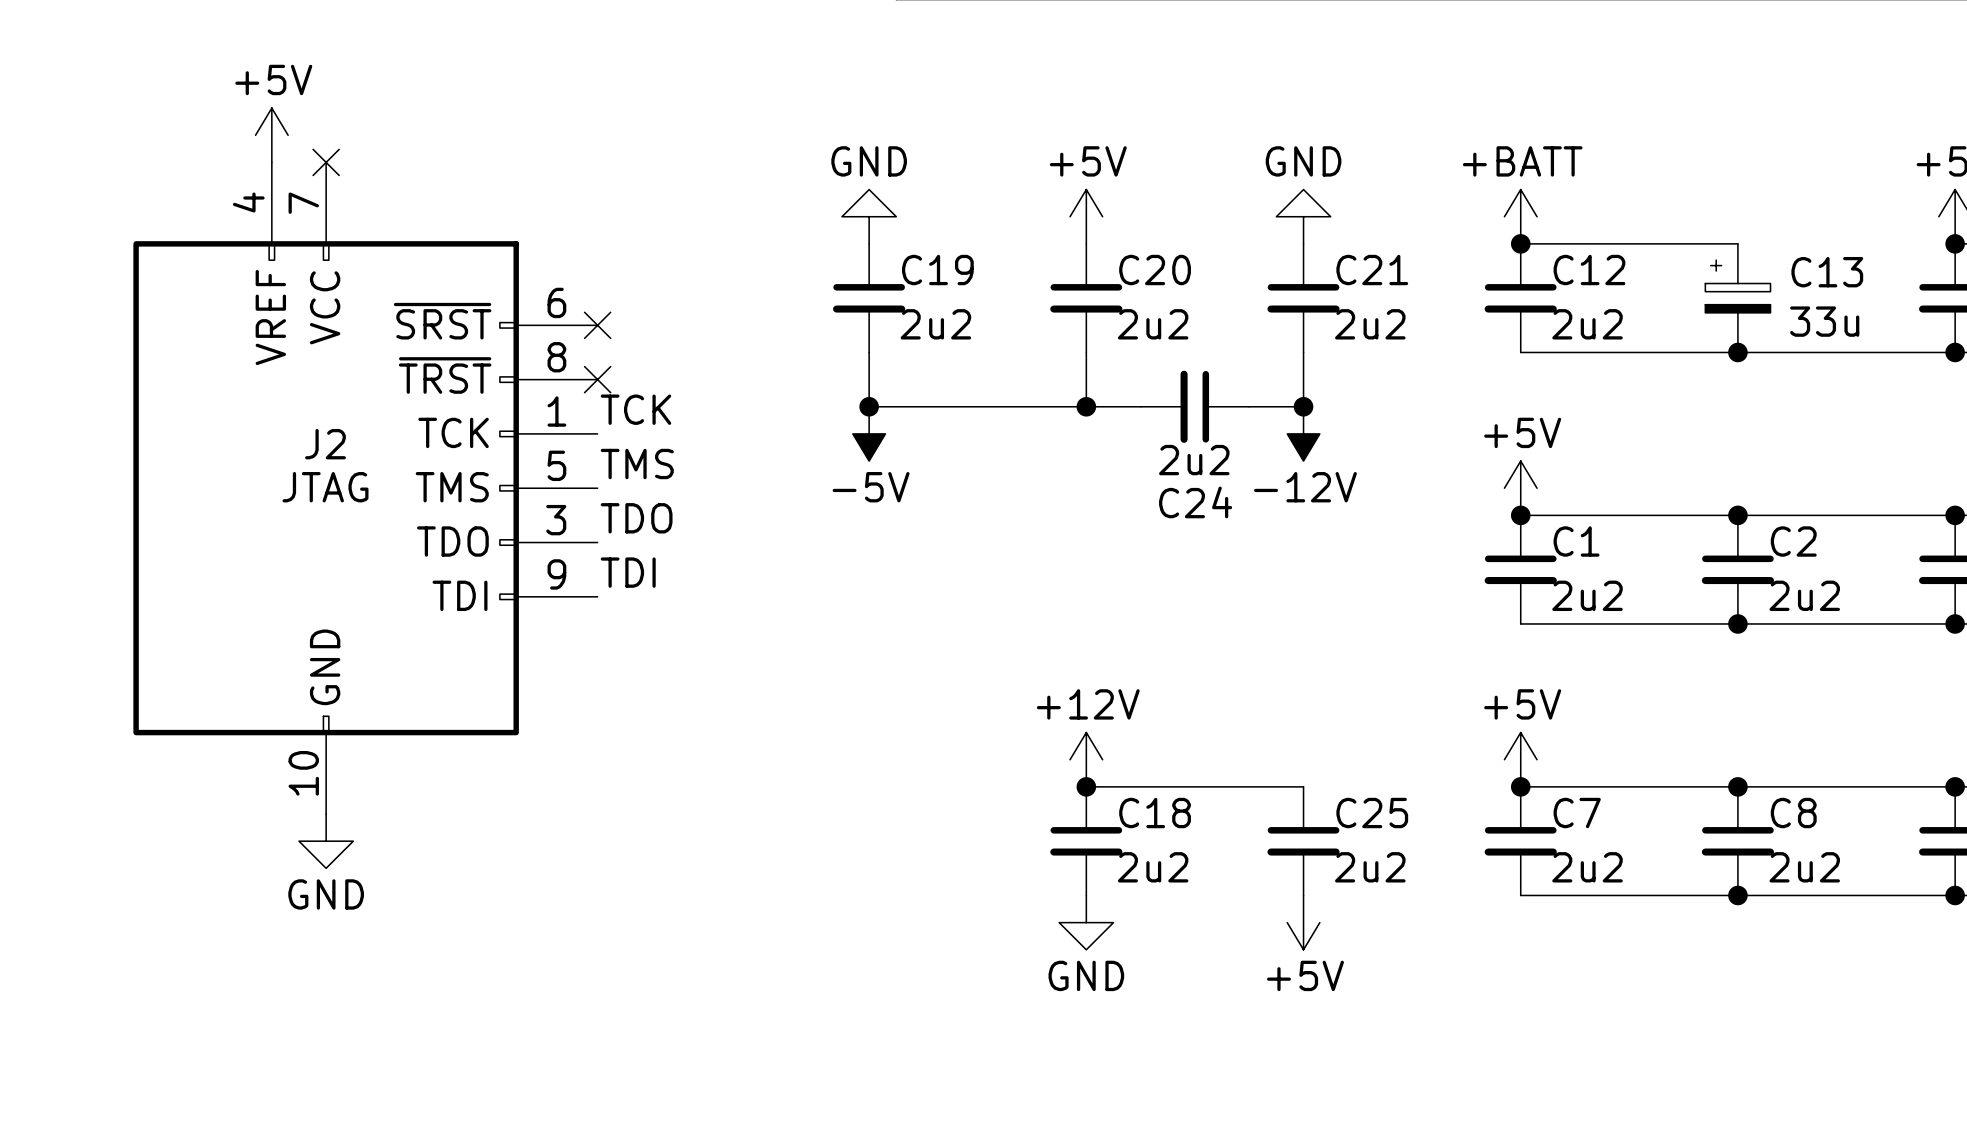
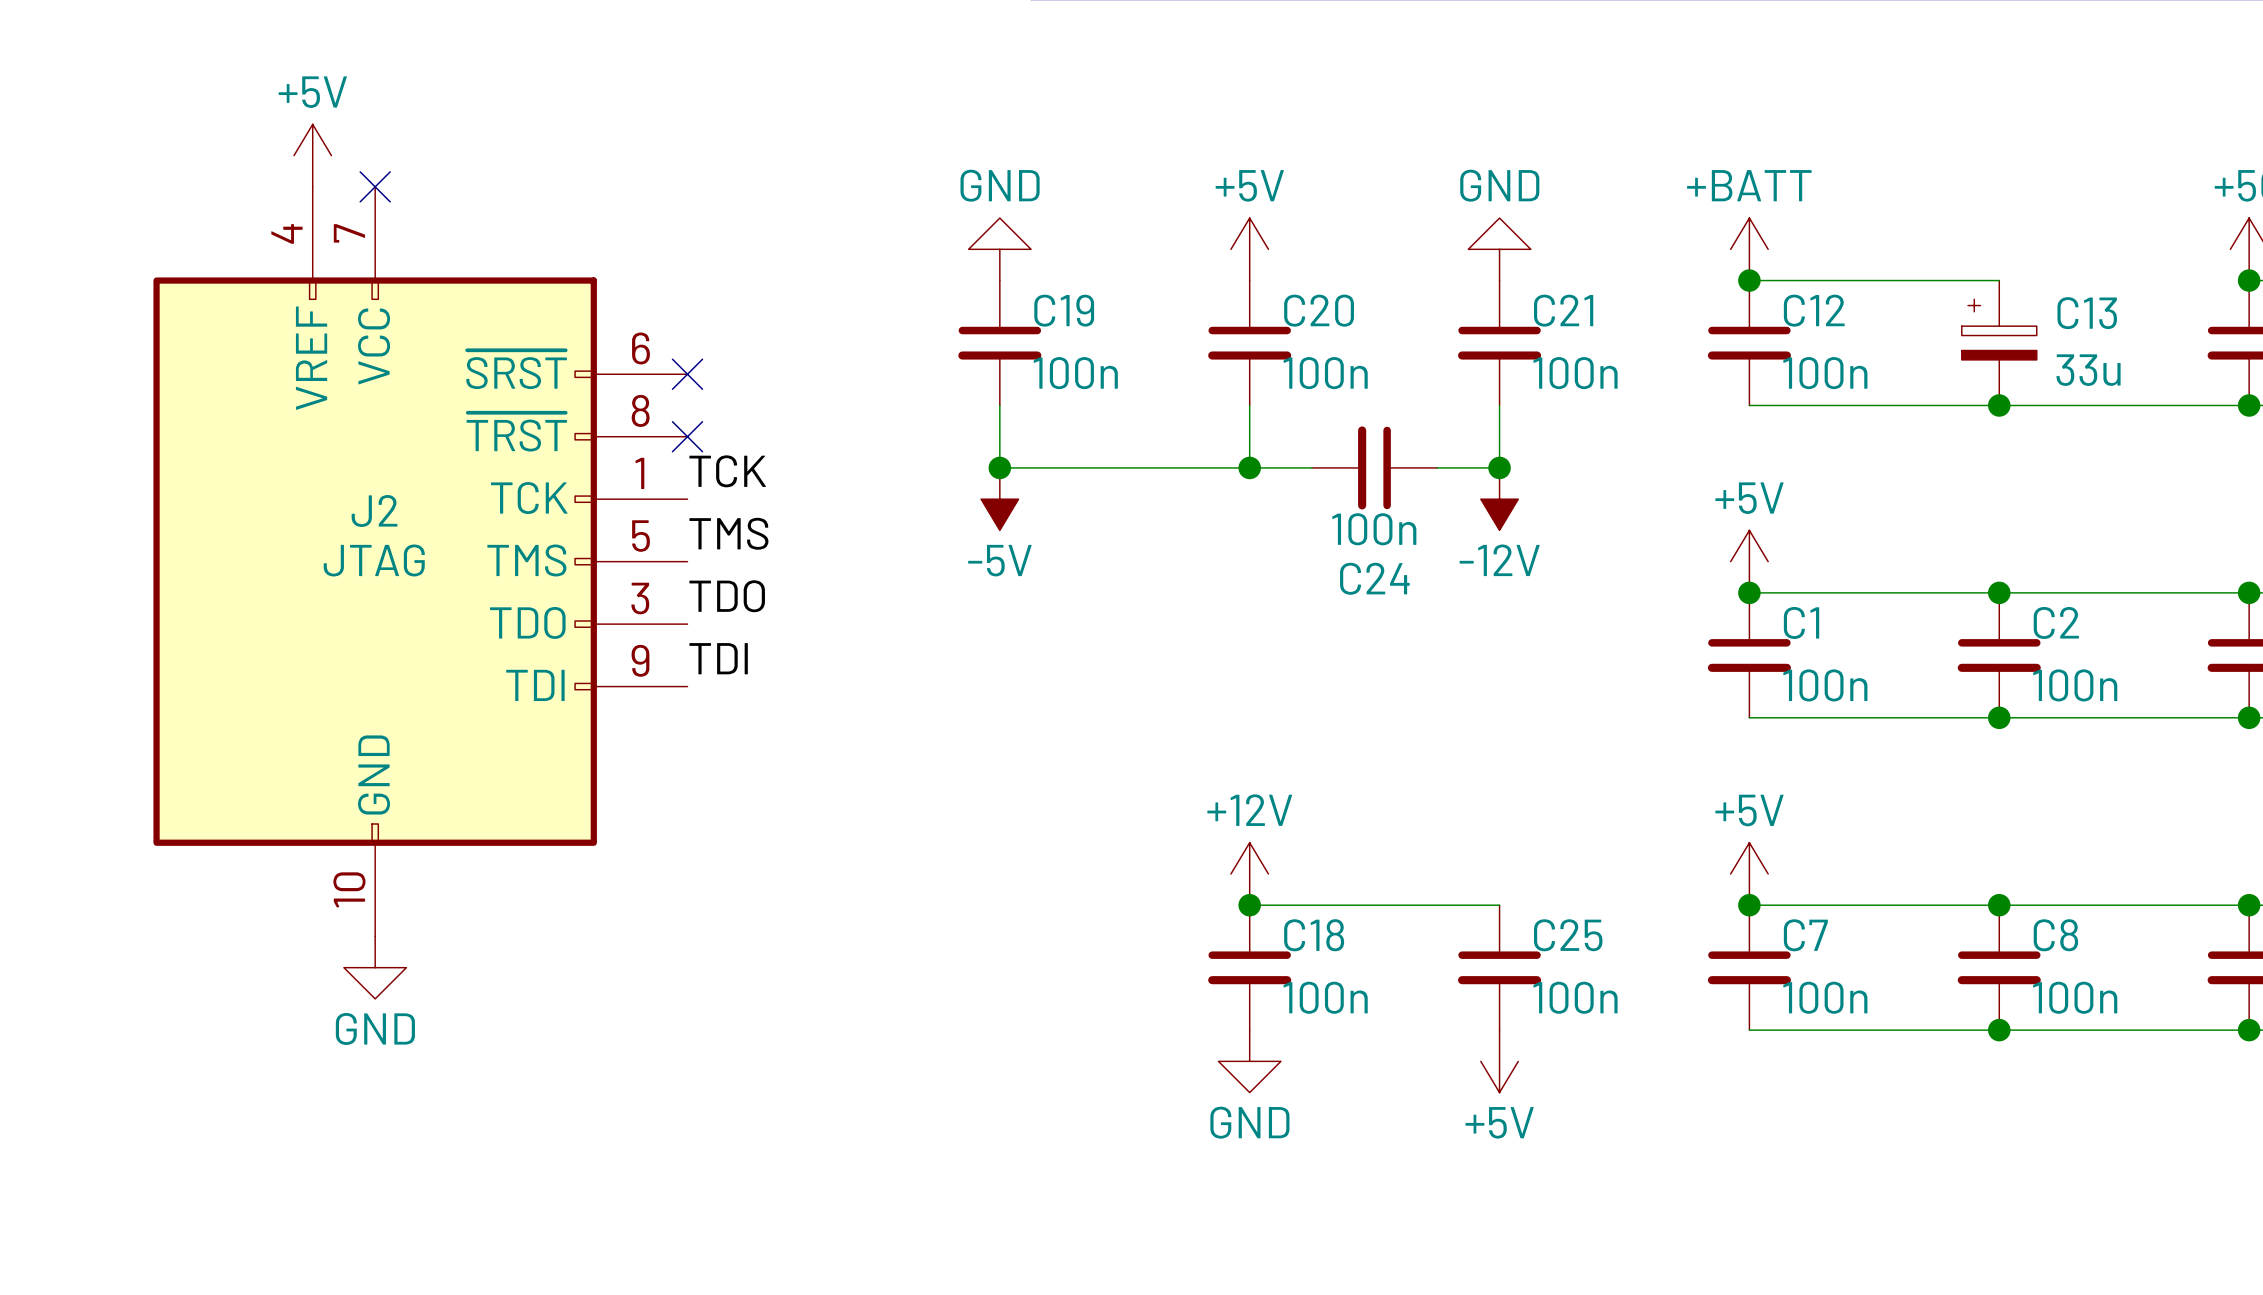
C19 value: 2u2 (935, 324) -> 100n (1075, 373)
C20 value: 2u2 (1153, 324) -> 100n (1325, 373)
C21 value: 2u2 (1370, 324) -> 100n (1575, 373)
C12 value: 2u2 (1587, 324) -> 100n (1825, 373)
C24 value: 2u2 (1194, 460) -> 100n (1374, 529)
C1 value: 2u2 (1587, 595) -> 100n (1825, 685)
C2 value: 2u2 (1804, 595) -> 100n (2075, 685)
C18 value: 2u2 (1153, 867) -> 100n (1325, 997)
C25 value: 2u2 (1370, 867) -> 100n (1575, 997)
C7 value: 2u2 (1587, 867) -> 100n (1825, 997)
C8 value: 2u2 (1804, 867) -> 100n (2075, 997)

